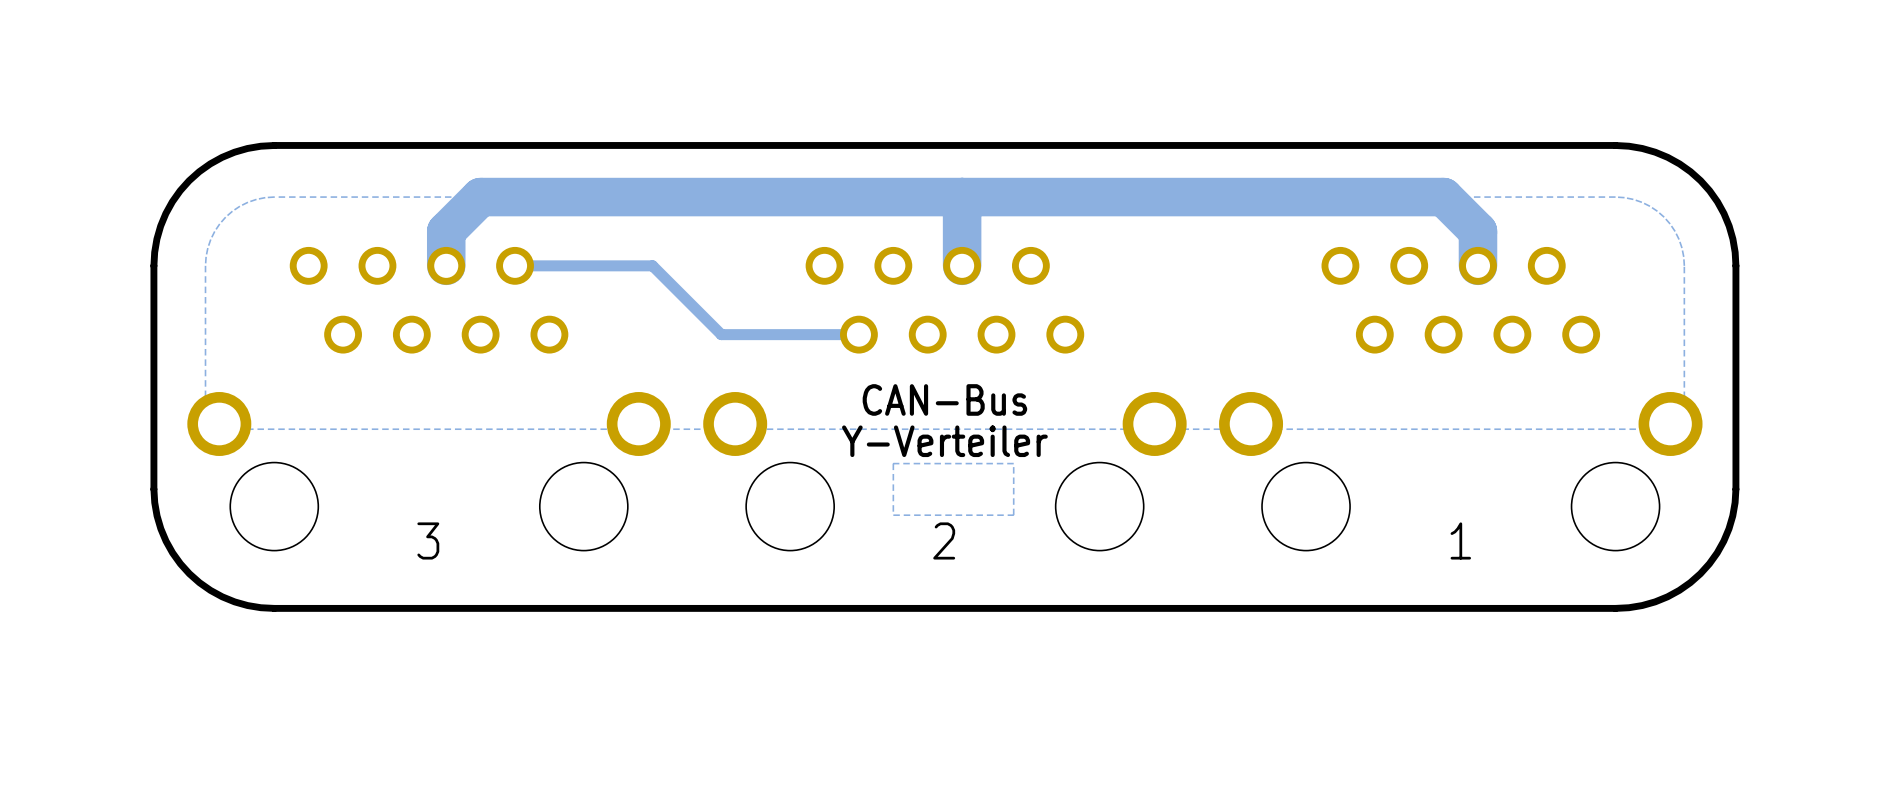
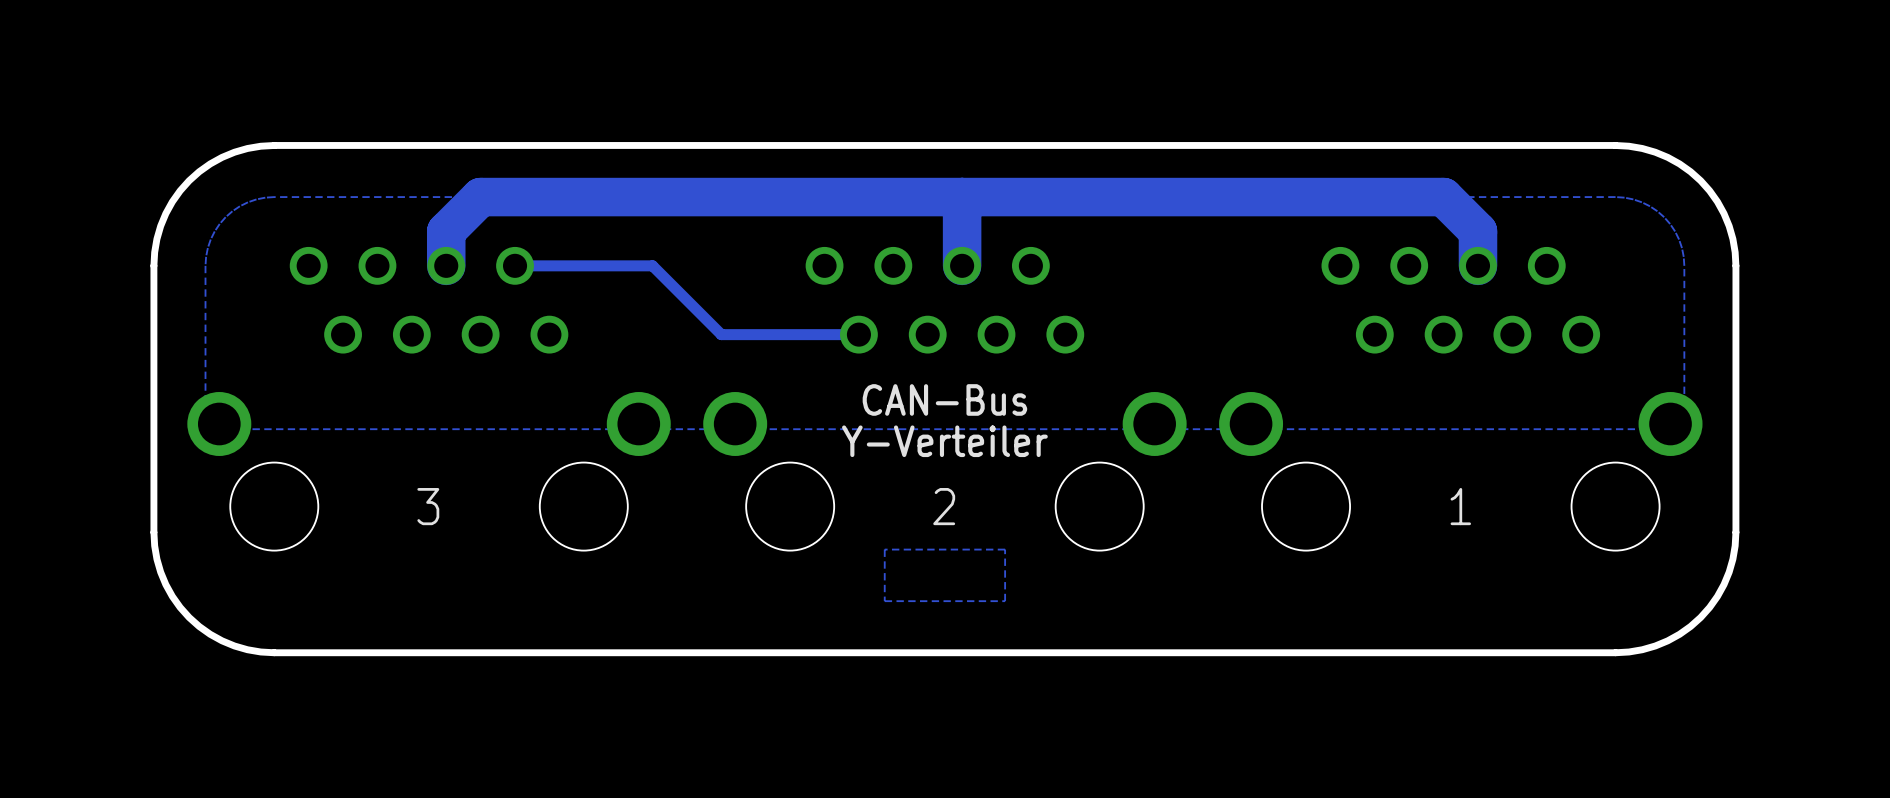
zone outline: (1013, 463) (1013, 515) (893, 515) (893, 463) (1013, 463) -> (1005, 549) (1005, 601) (884, 601) (884, 549) (1005, 549)
board edge: (1735, 489) (1732, 515) (1723, 541) (1717, 552) (1700, 573) (1679, 590) (1655, 601) (1628, 607) (1615, 608) (260, 607) (234, 601) (222, 596) (199, 582) (189, 573) (172, 552) (166, 541) (157, 515) (153, 489) -> (1735, 489) (1735, 532) (1732, 559) (1724, 584) (1709, 607) (1690, 626) (1667, 640) (1642, 649) (1615, 652) (260, 651) (234, 645) (210, 634) (189, 617) (172, 596) (160, 572) (156, 559) (153, 532) (153, 489)
text position: 3 (428, 540) -> 3 (428, 506)
text position: 2 (944, 540) -> 2 (944, 506)
text position: 1 (1460, 540) -> 1 (1460, 506)

